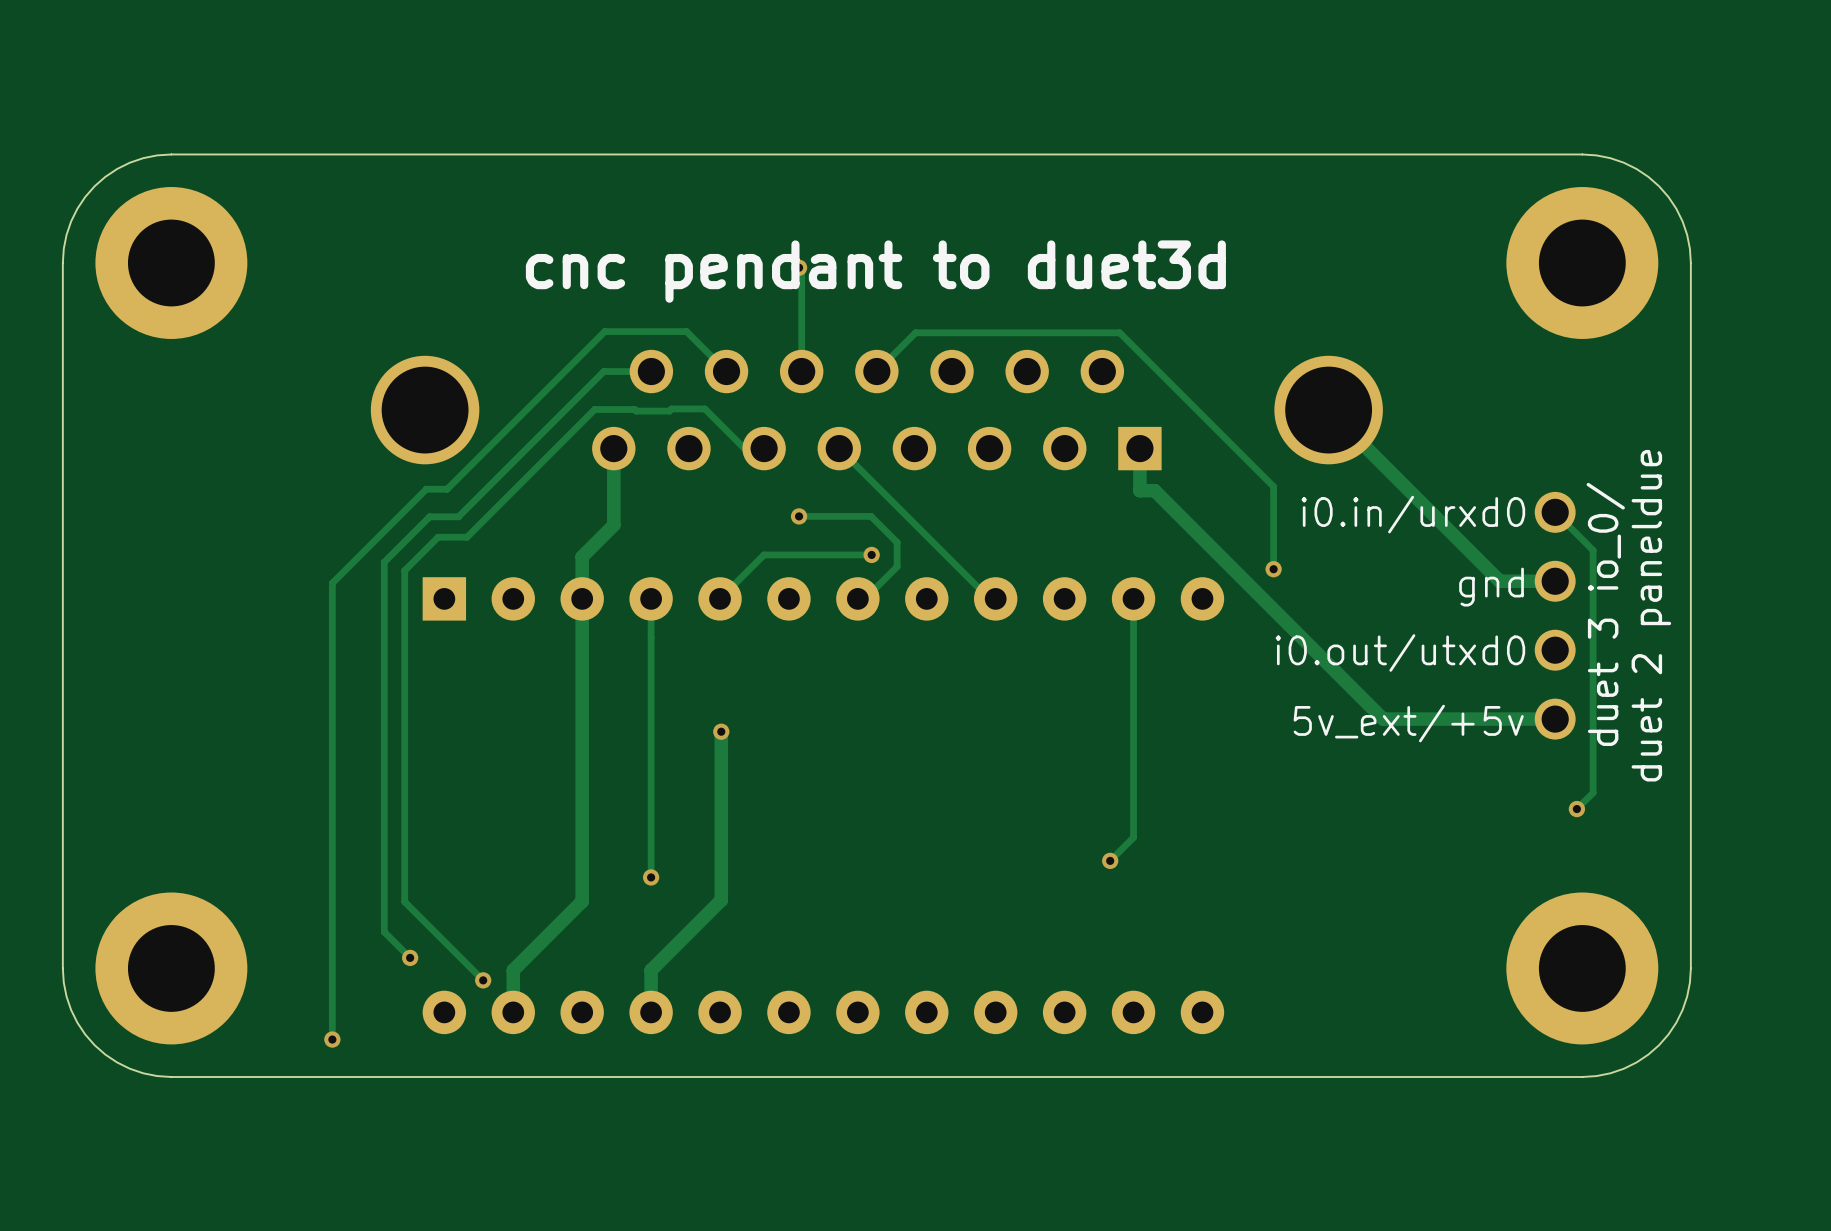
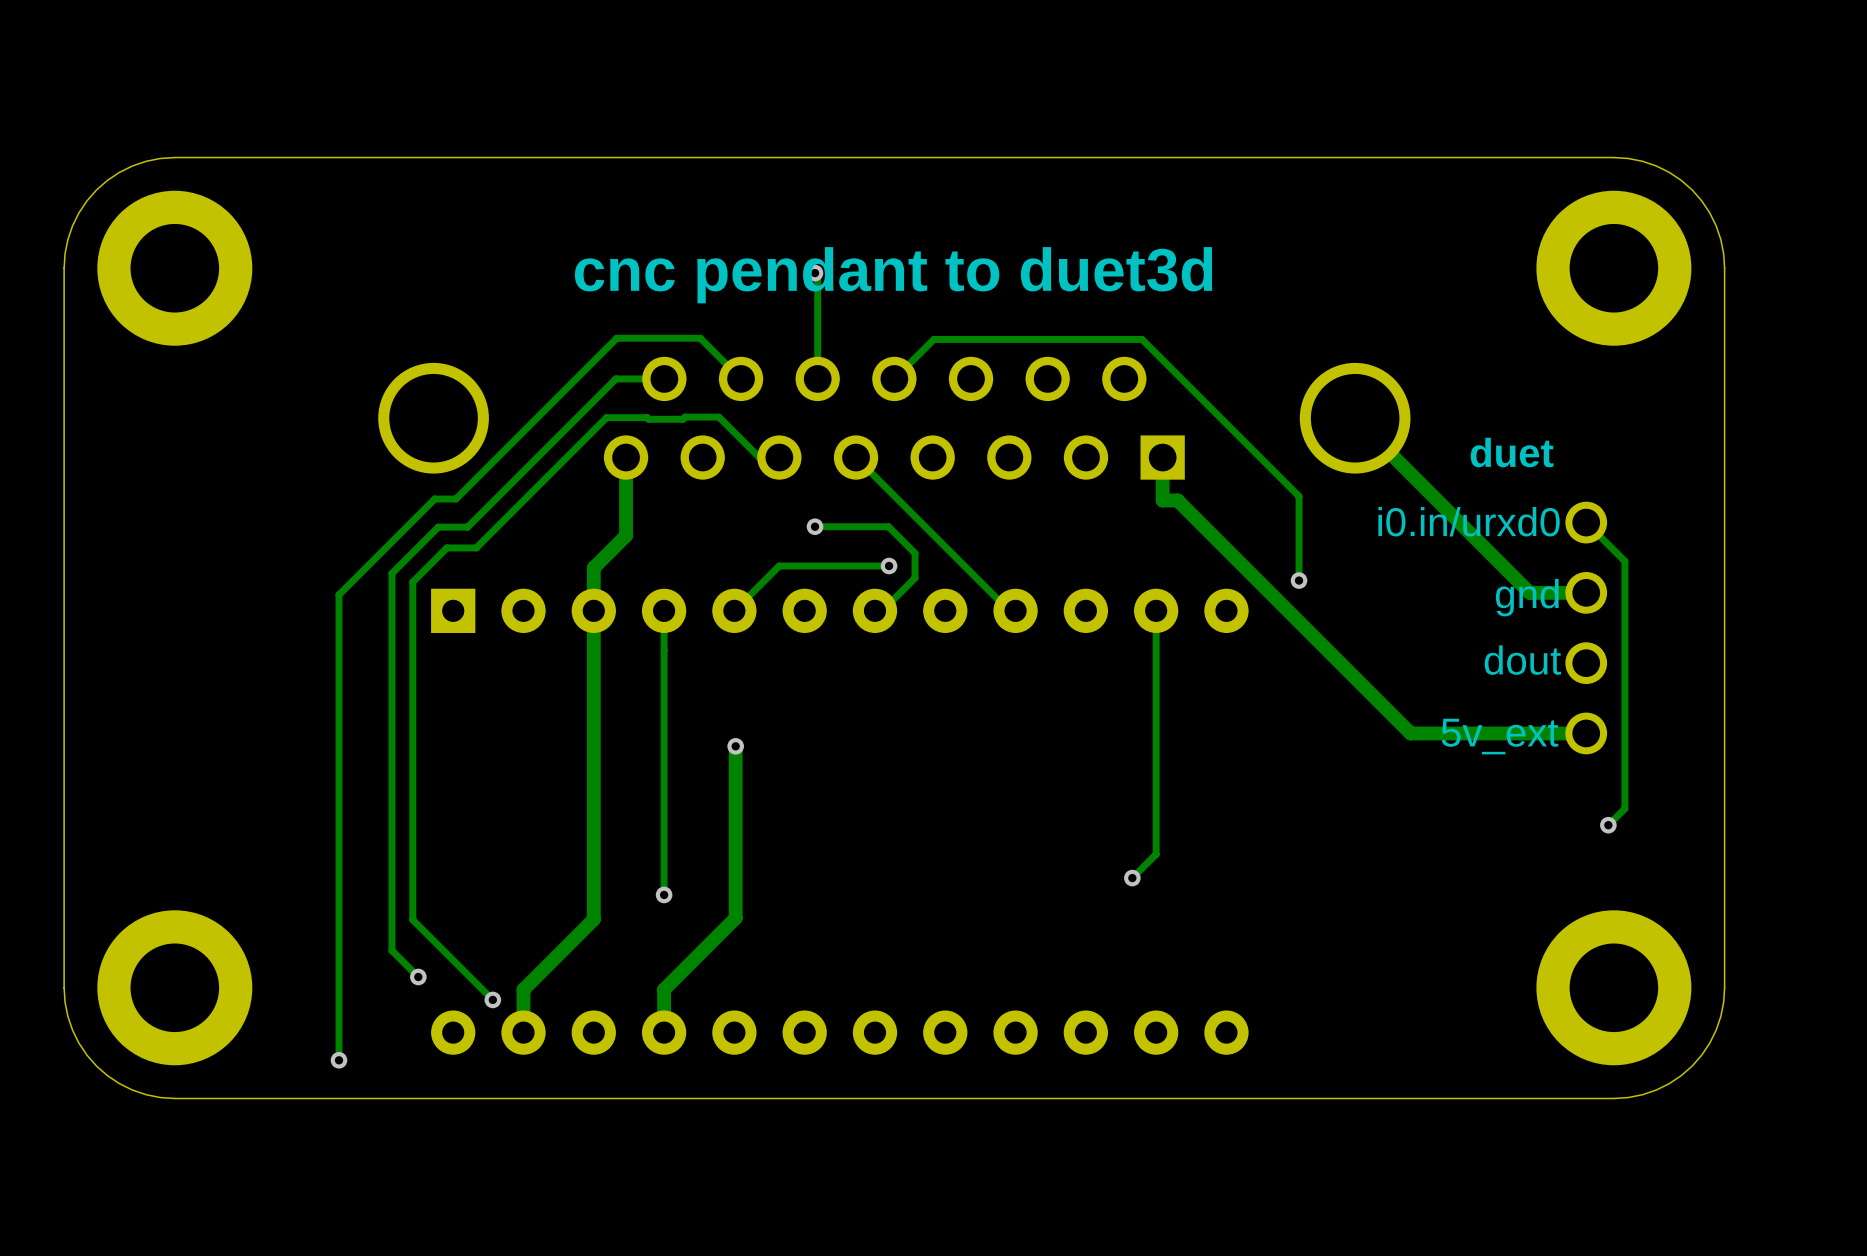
text: none -> duet (1512, 452)
text: duet 3 io_0/ (1605, 614) -> none
text: duet 2 paneldue (1651, 615) -> none
text: i0.out/utxd0 (1400, 652) -> dout (1522, 660)
text: 5v_ext/+5v (1408, 723) -> 5v_ext (1499, 736)

